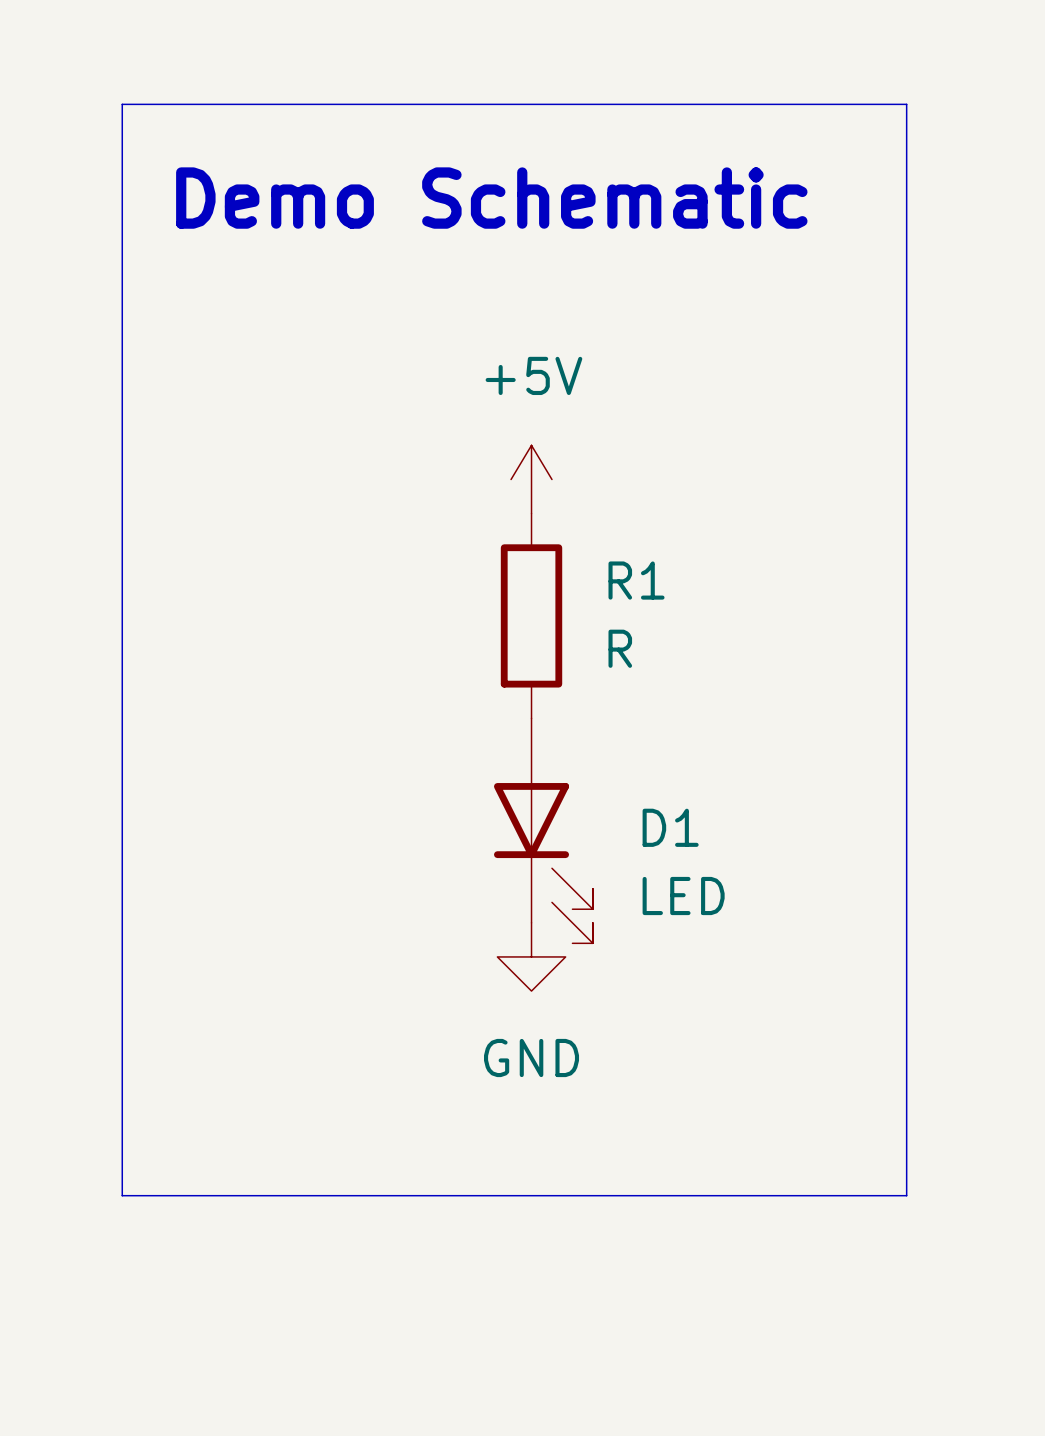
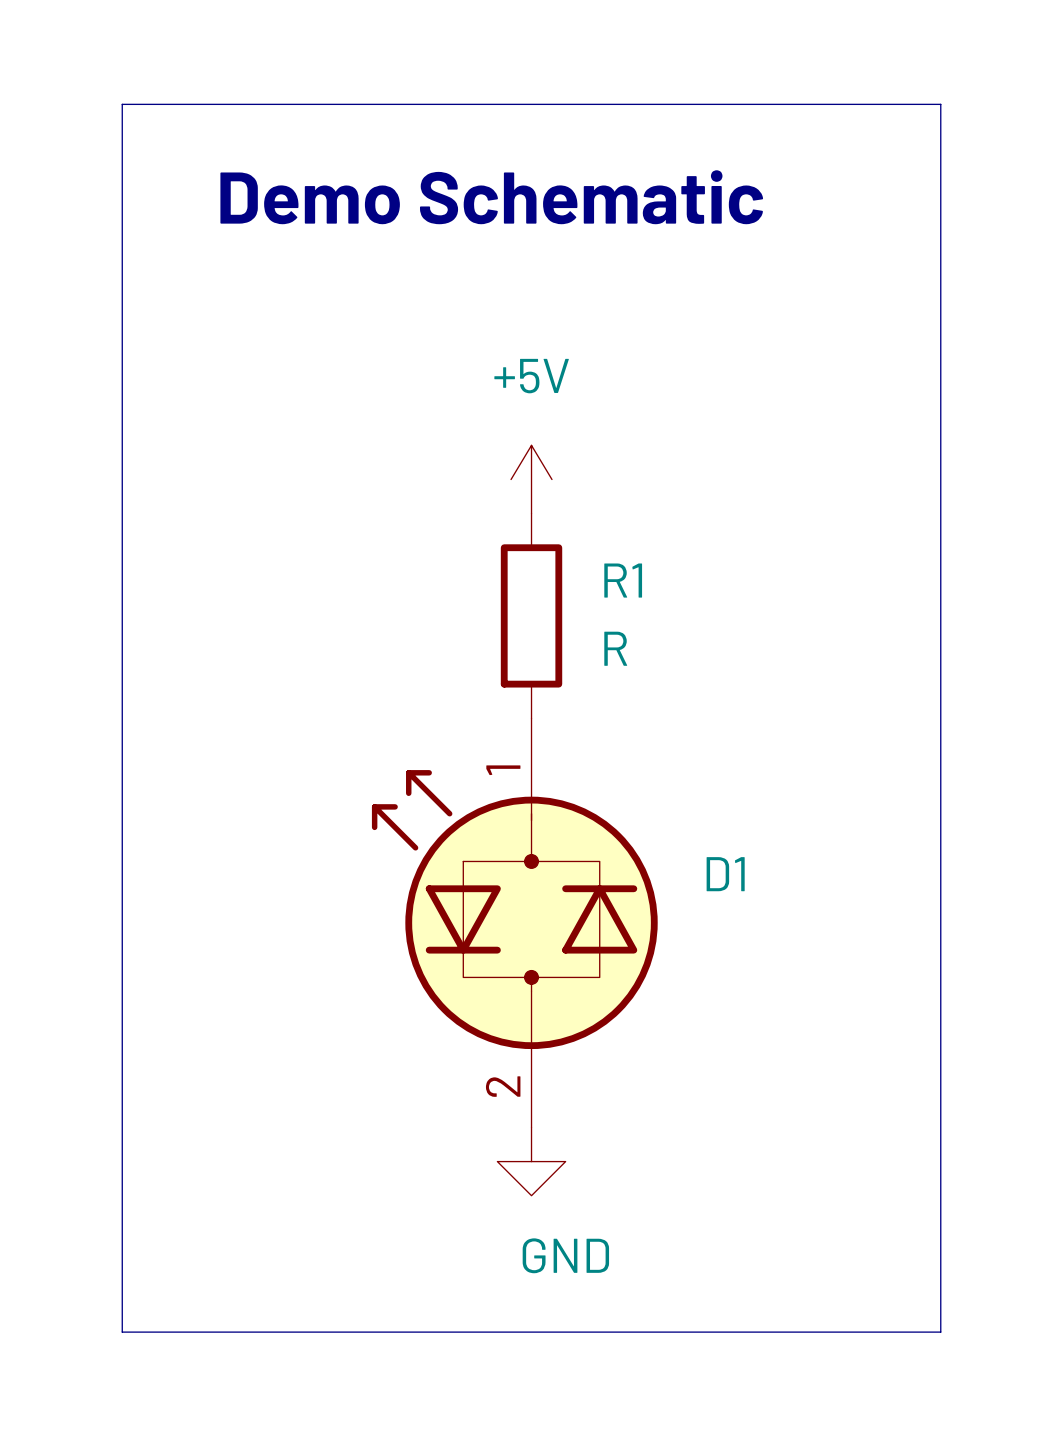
line: (906, 104) (906, 1195) (122, 1195) -> (906, 104) (940, 104) (940, 1332) (122, 1332) (122, 1195)
D1 symbol: [494, 718, 593, 944] -> [371, 718, 658, 1128]
D1 name position: D1 (670, 827) -> D1 (725, 874)
D1 value: LED (683, 896) -> none
power symbol position: GND (531, 956) -> GND (531, 1161)
power symbol text position: GND (531, 1058) -> GND (565, 1255)

